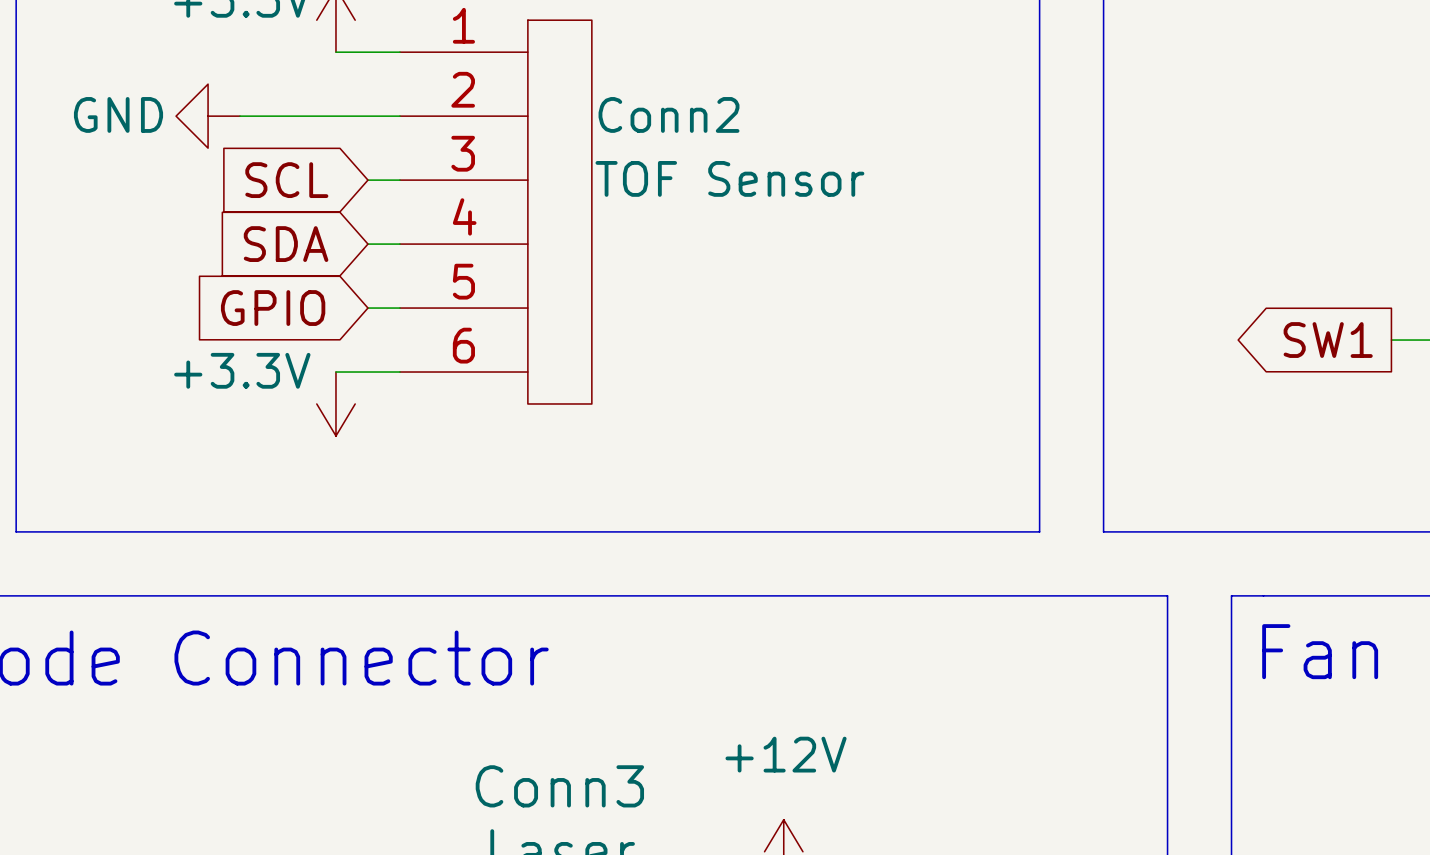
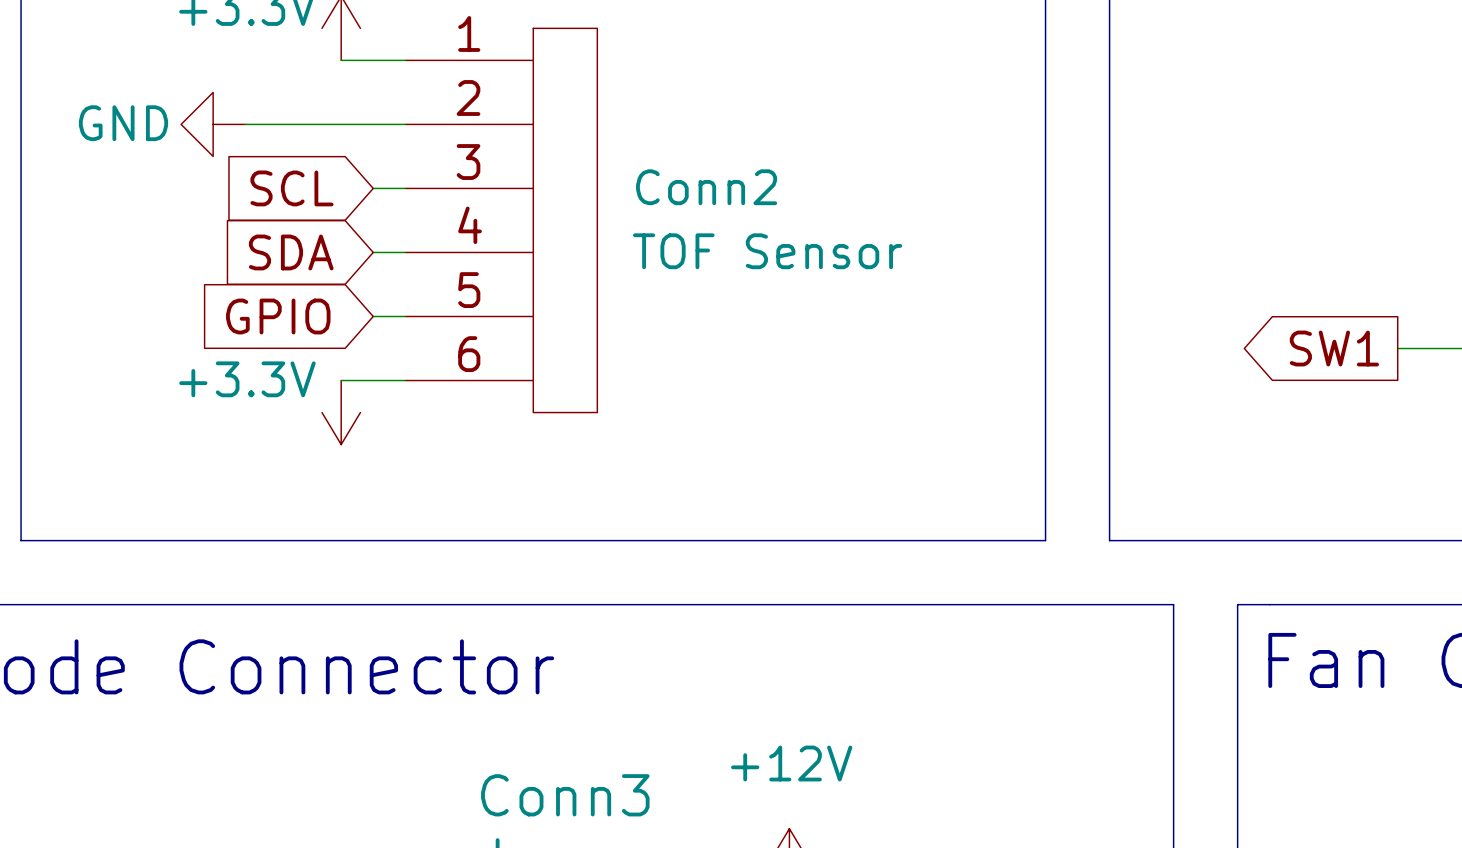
Conn2 name position: Conn2 (669, 114) -> Conn2 (706, 187)
Conn2 value position: TOF Sensor (729, 178) -> TOF Sensor (767, 251)

